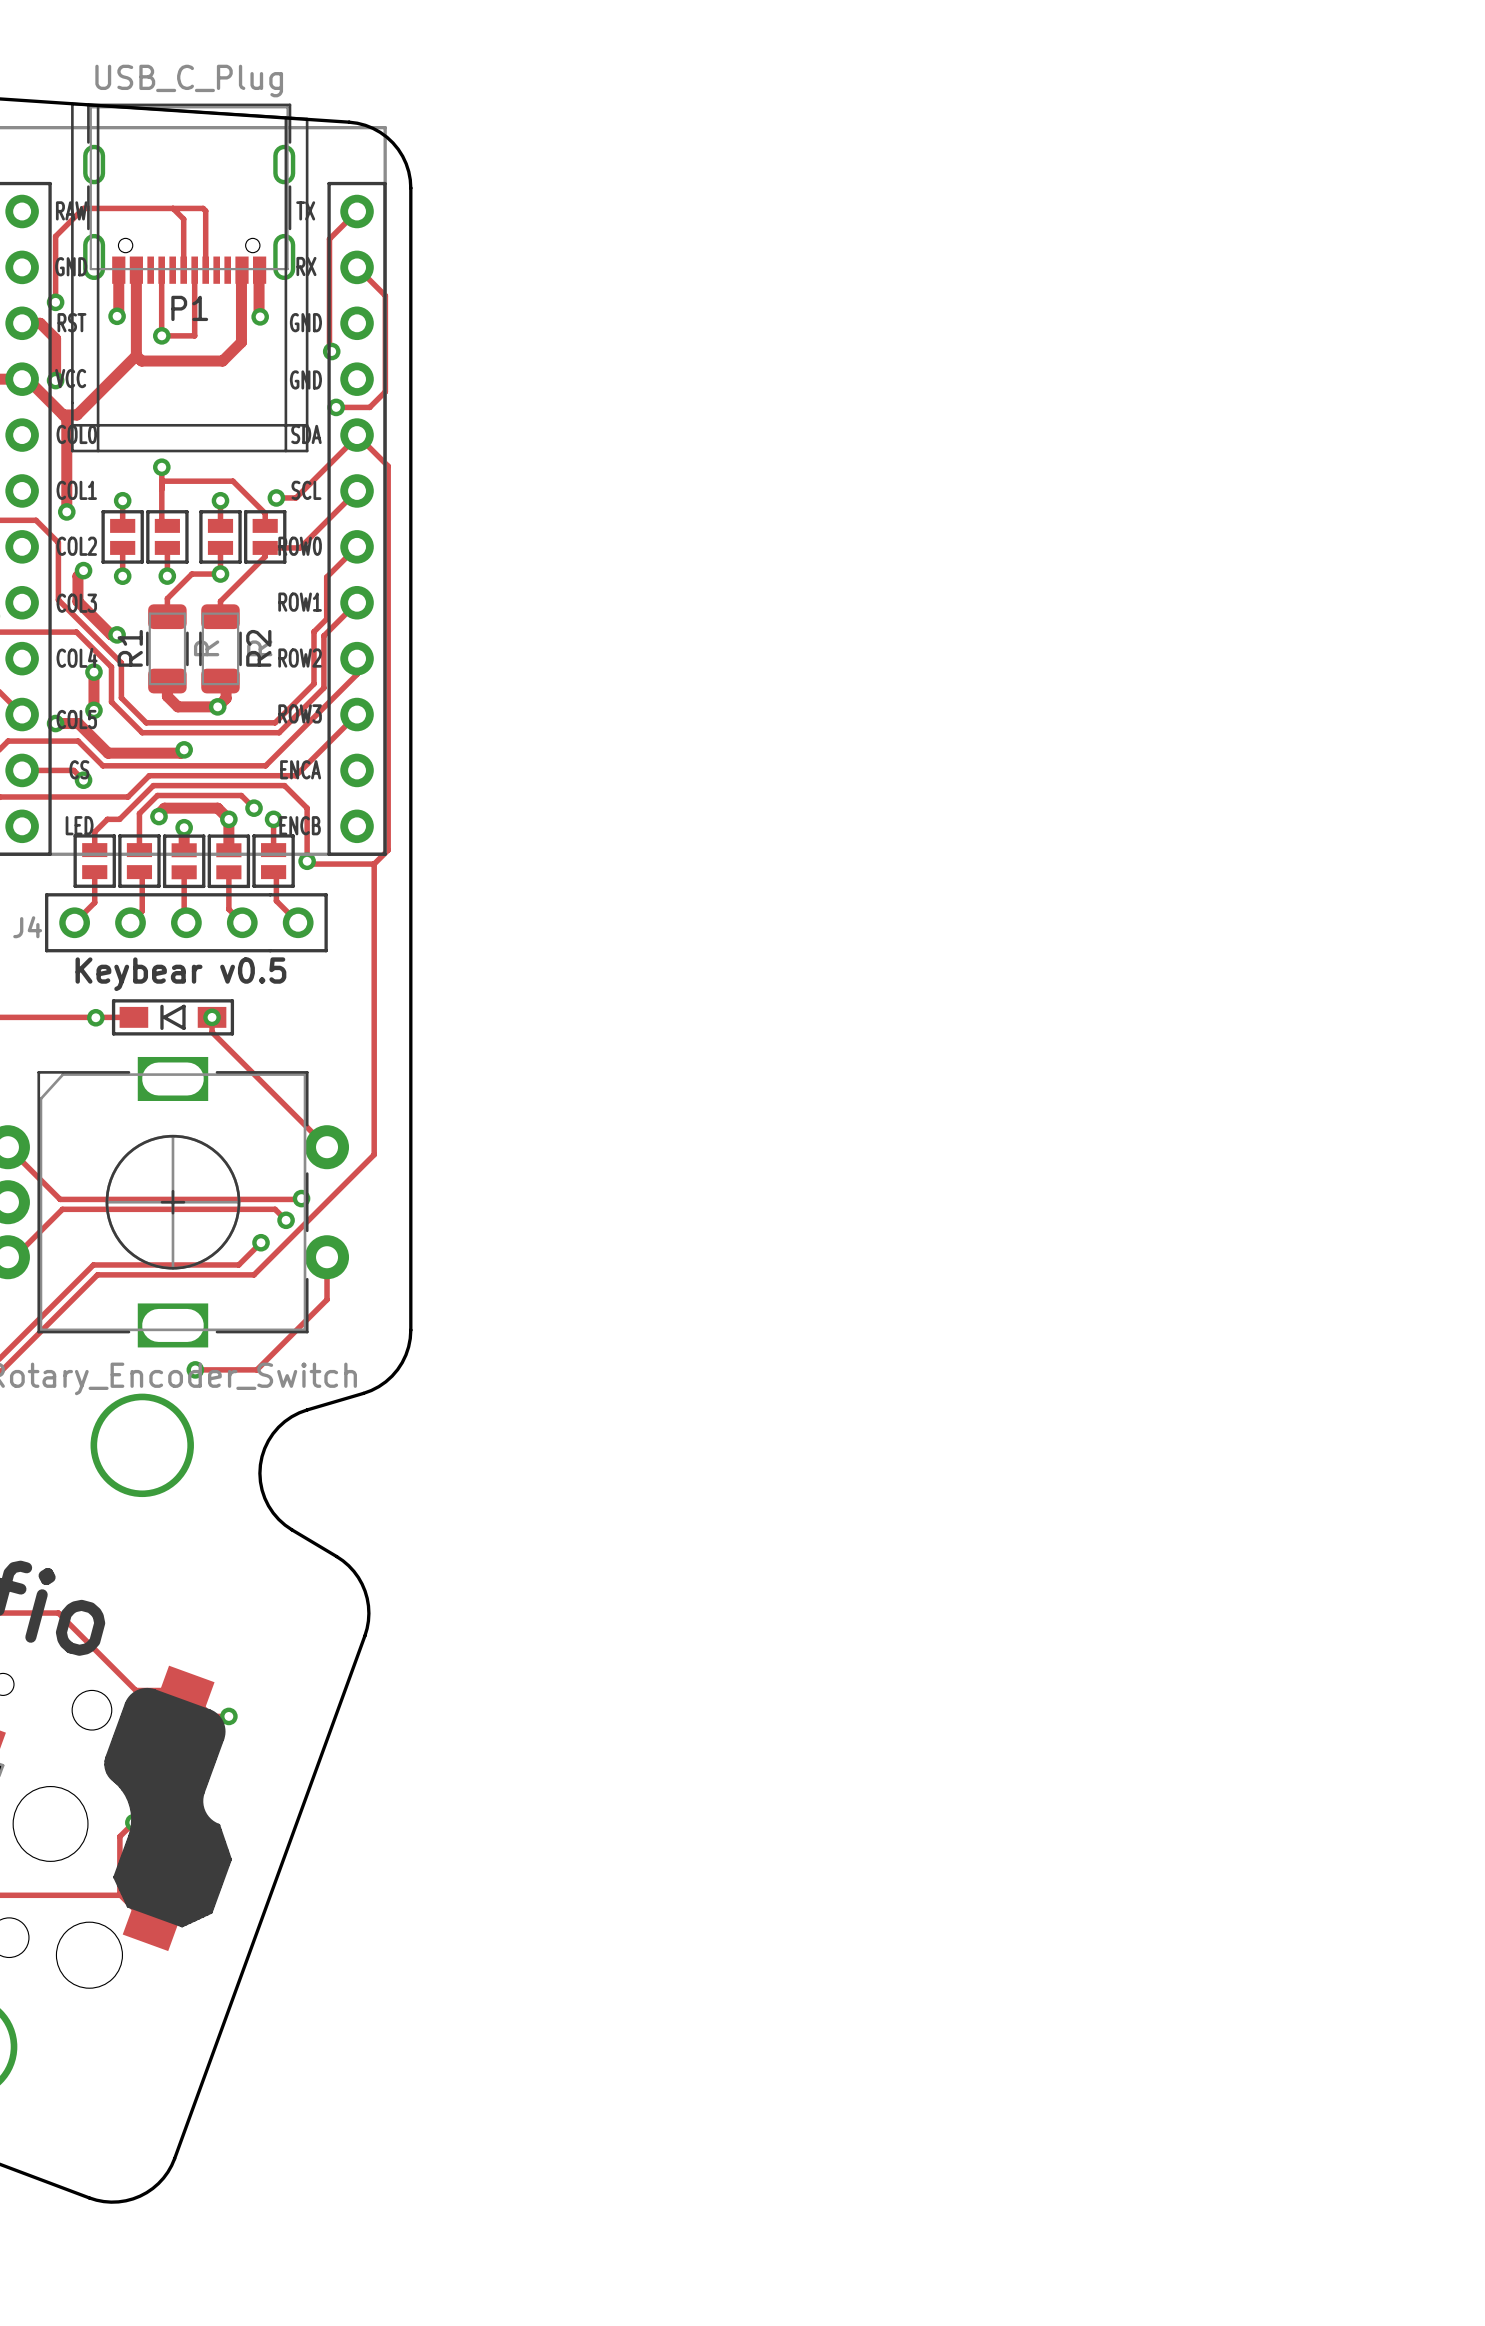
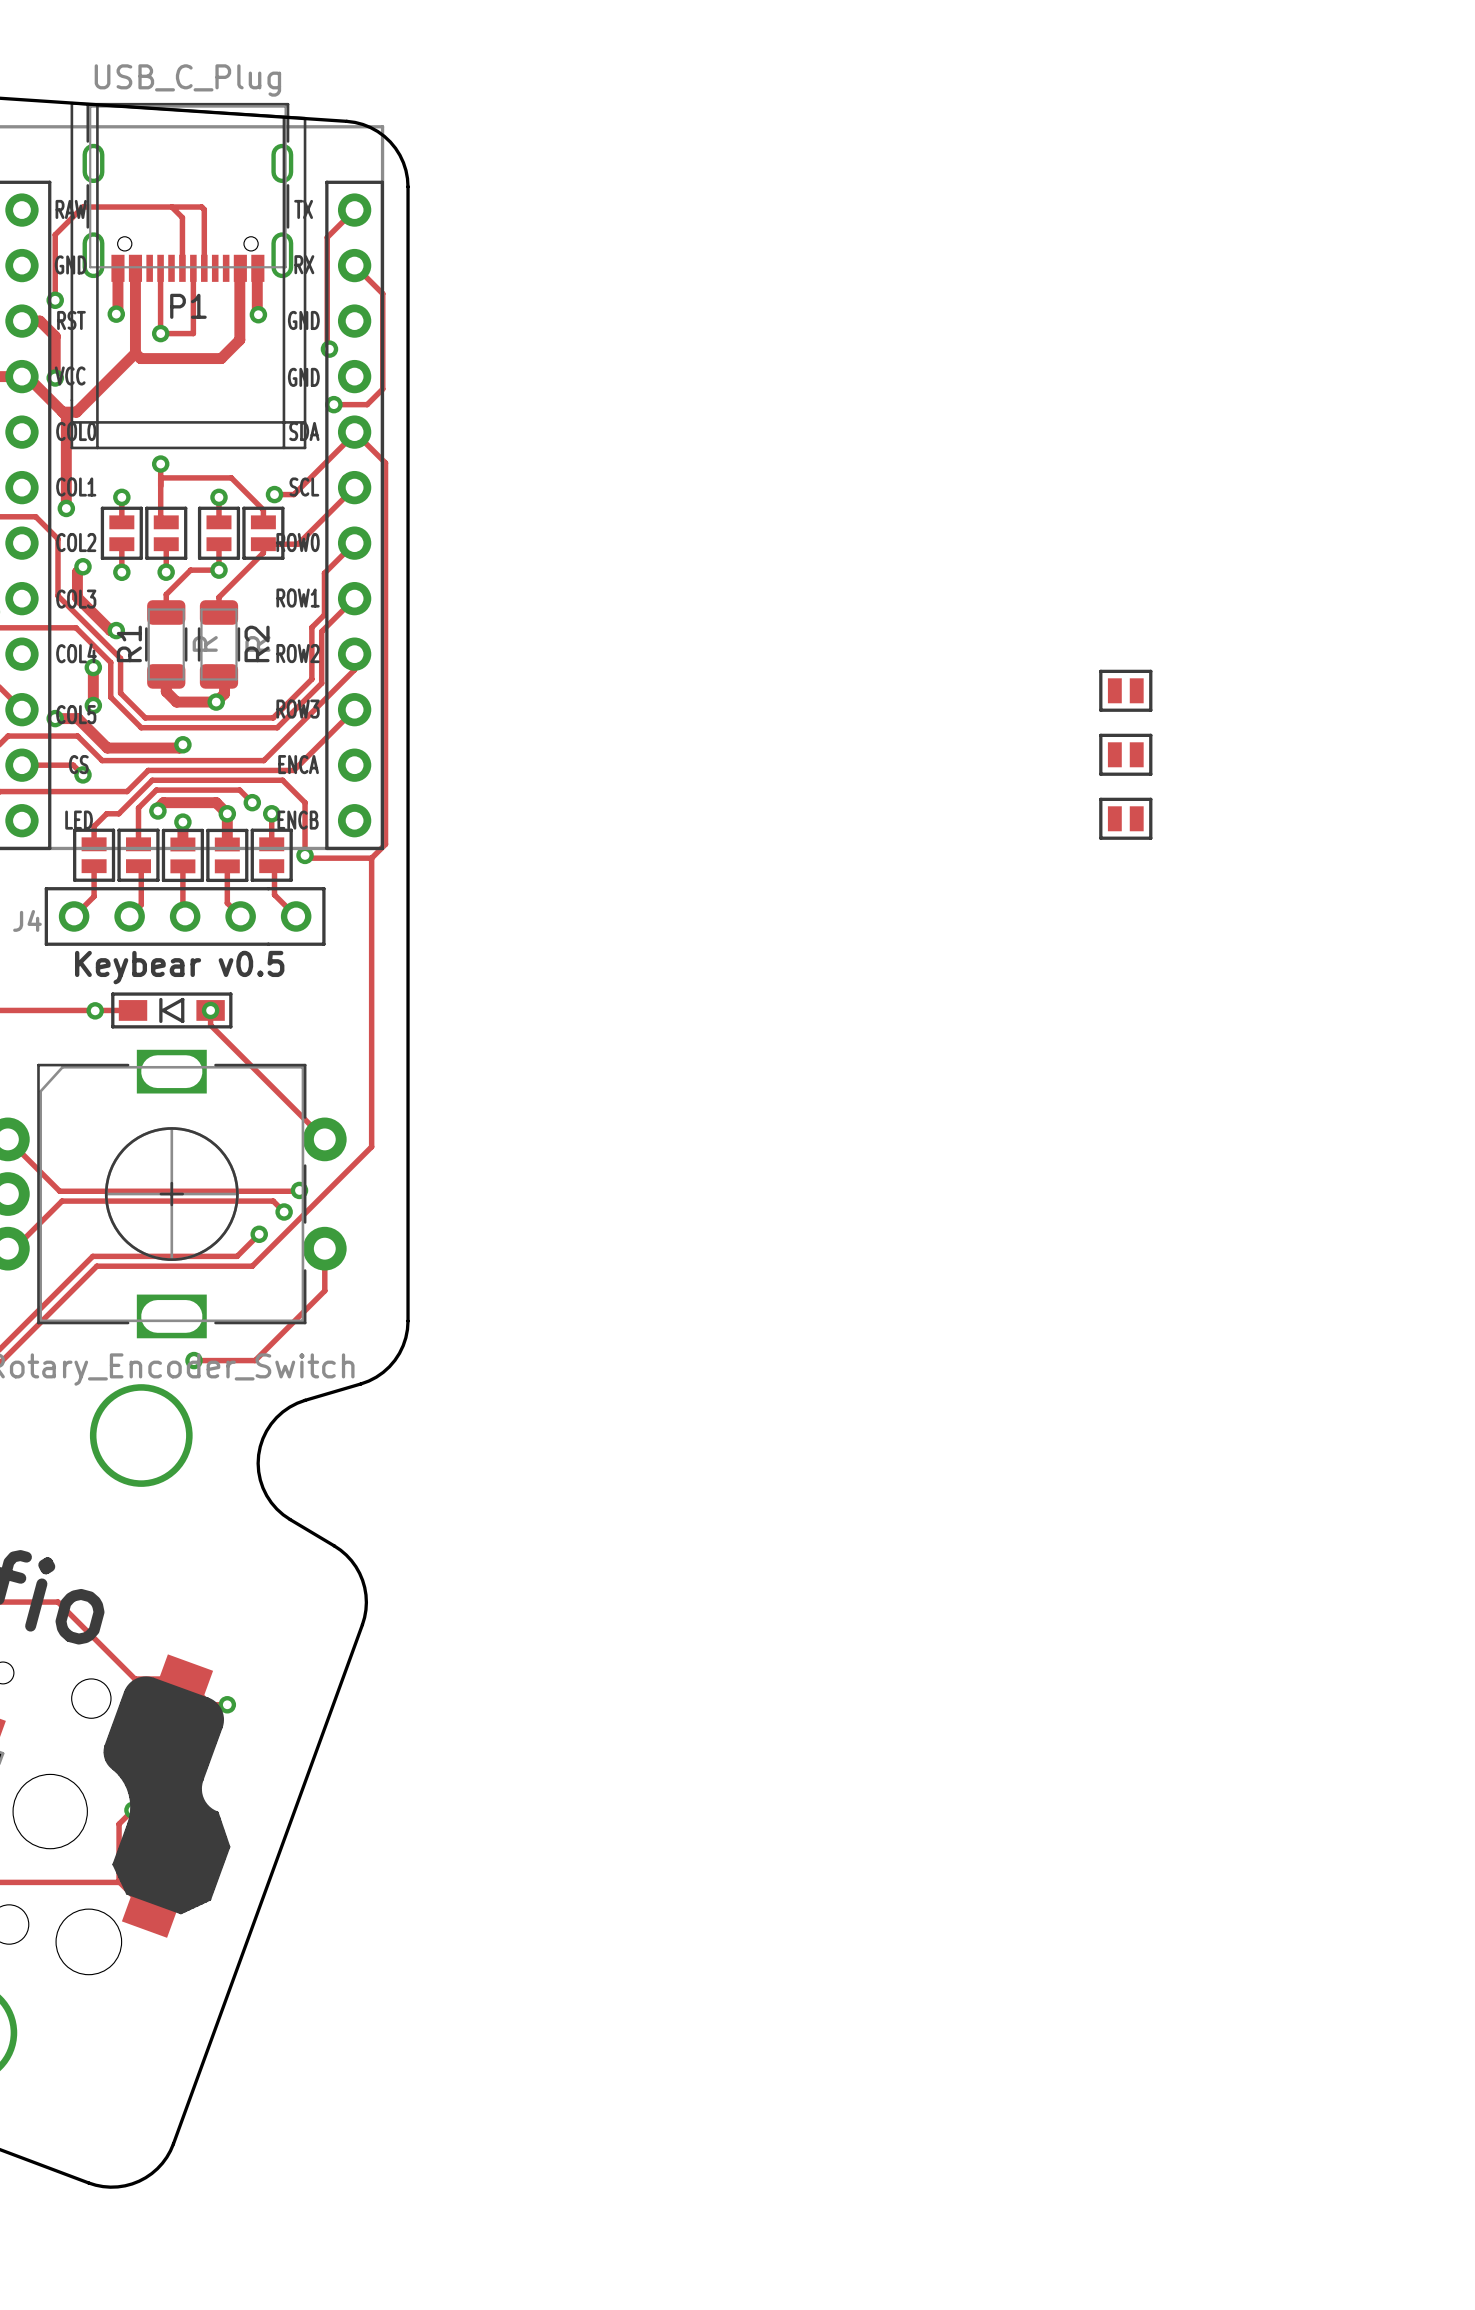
part: none -> (1125, 690)
part: none -> (1125, 754)
part: none -> (1125, 818)

